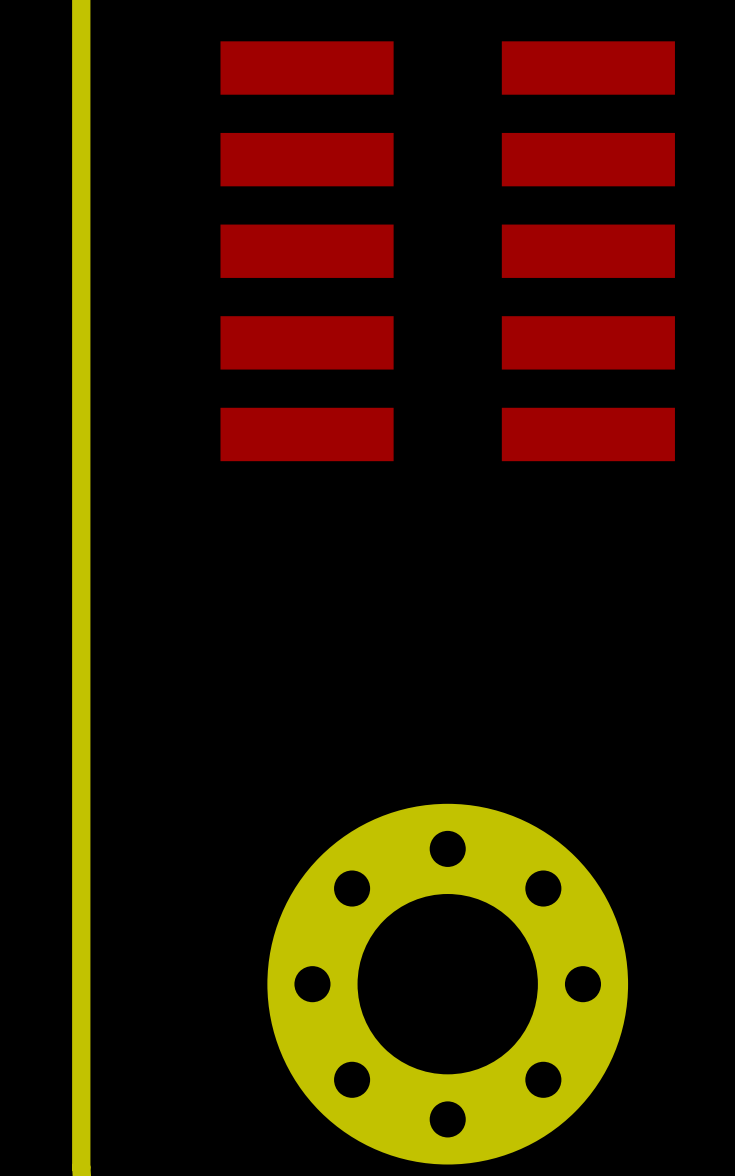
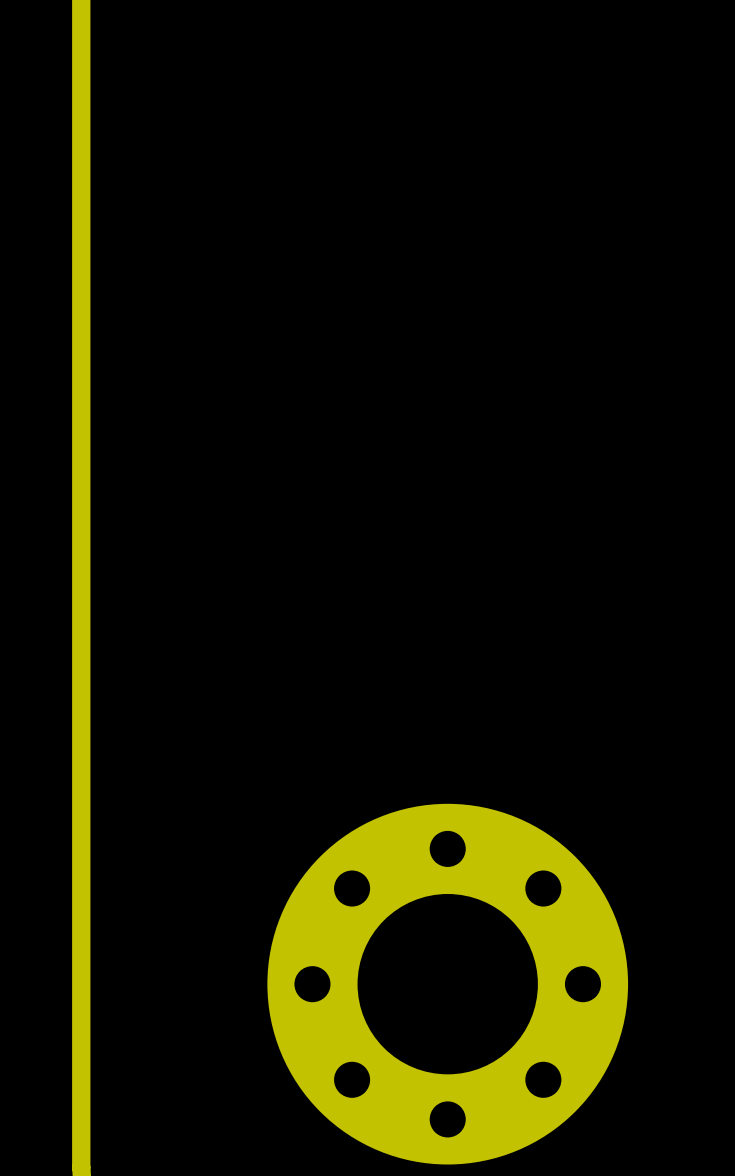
part: (447, 251) -> none

